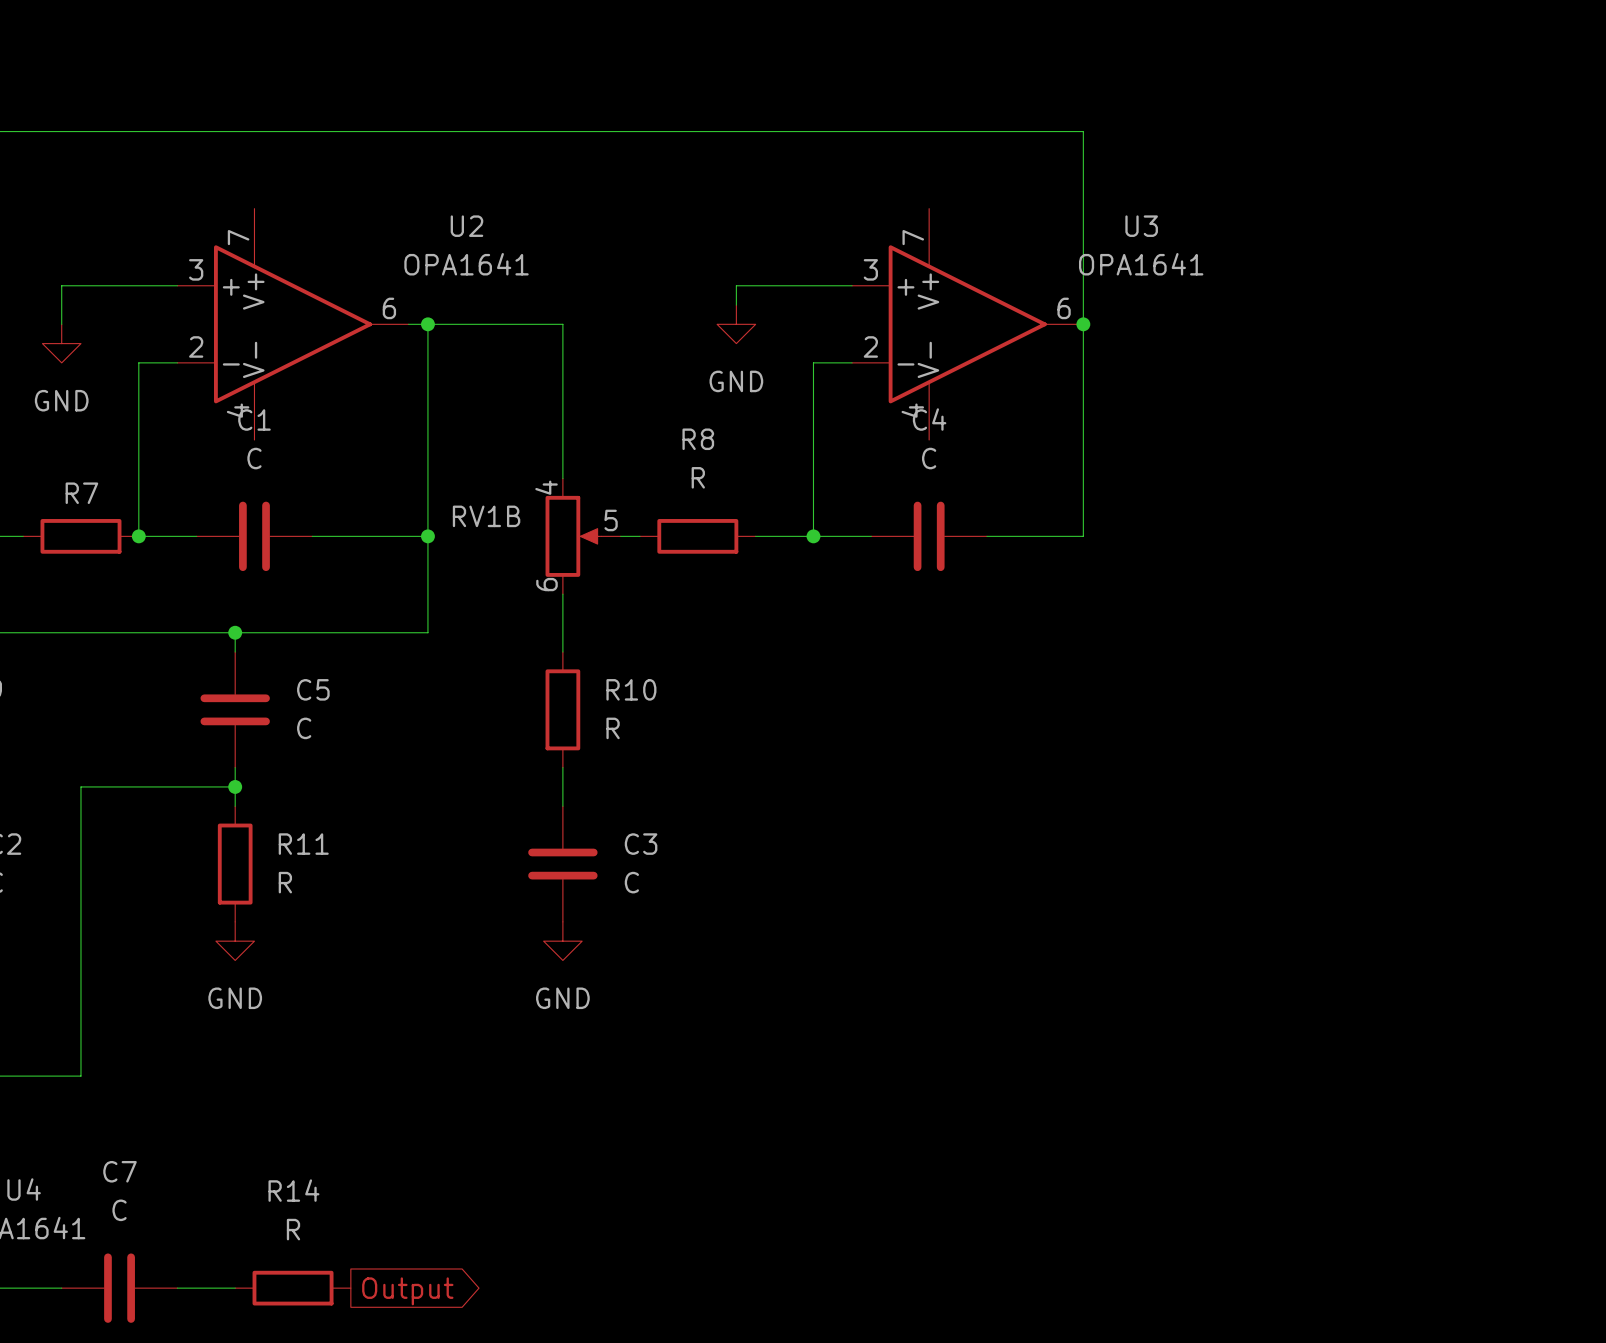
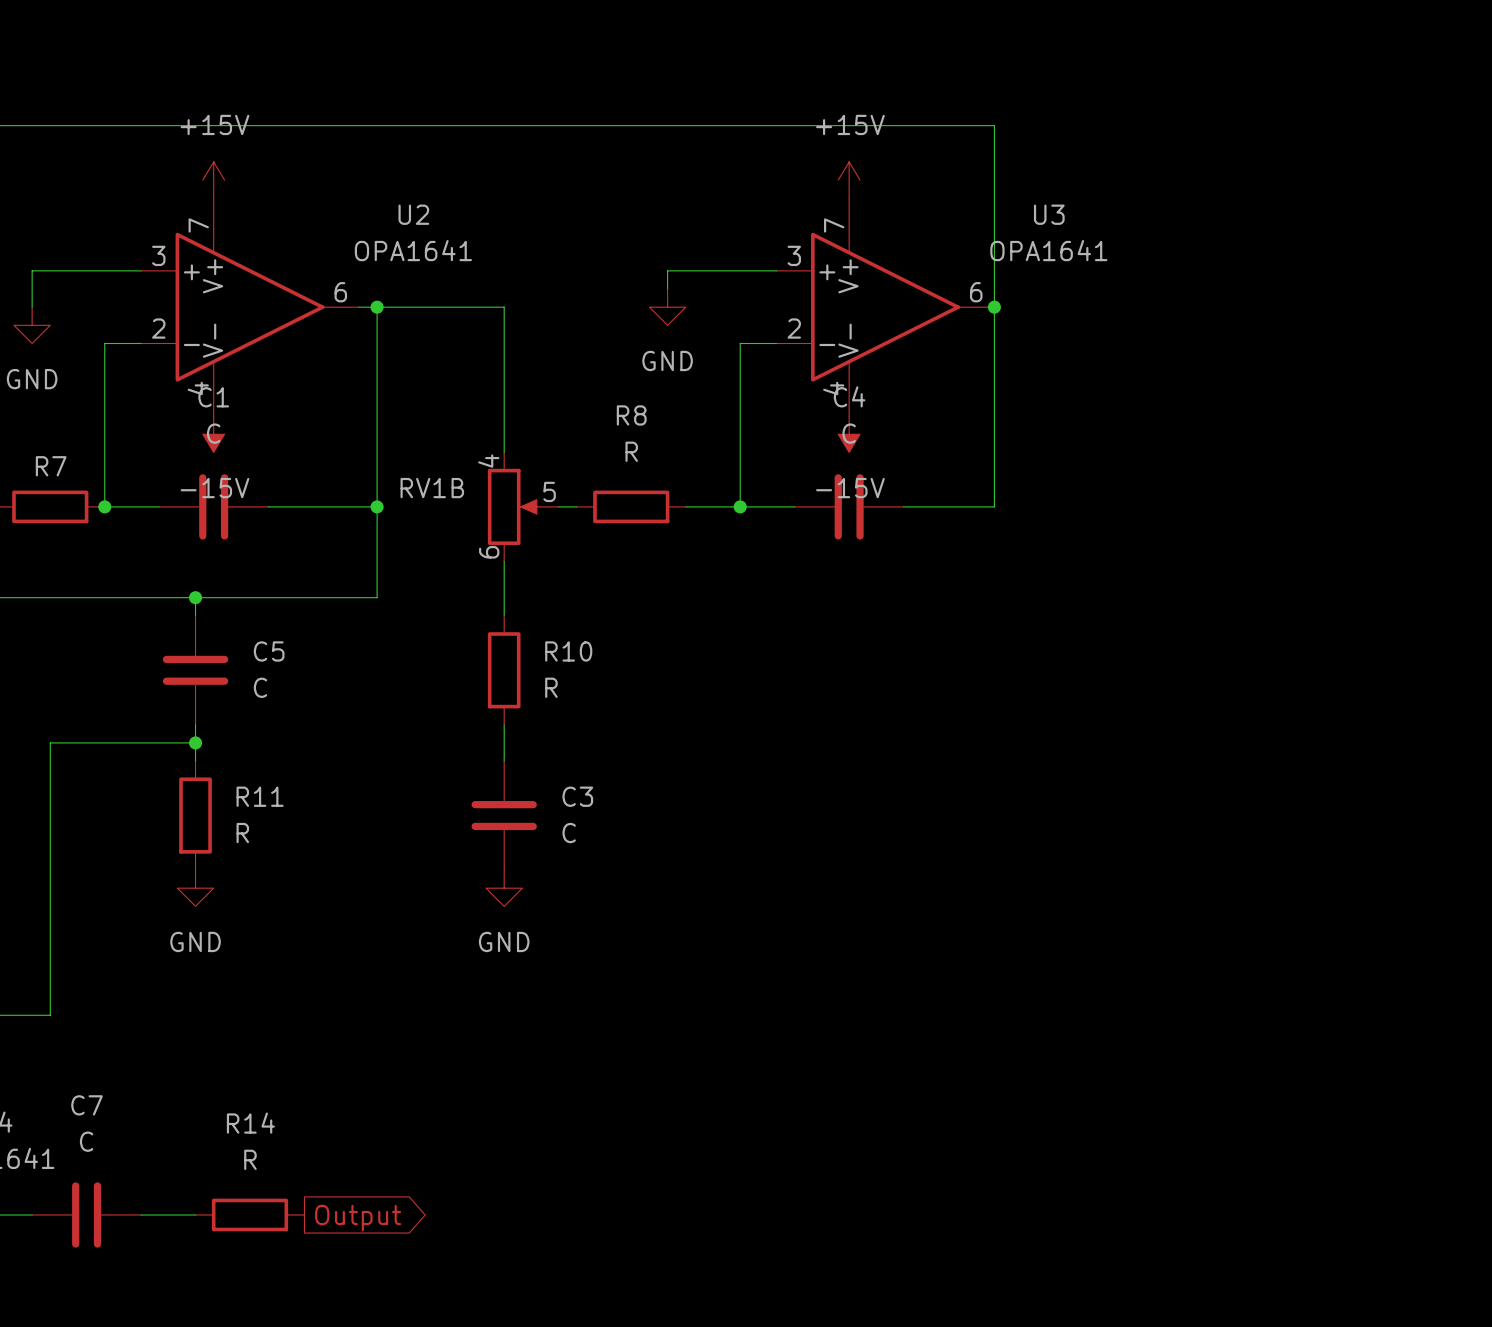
power symbol: none -> +15V (213, 180)
power symbol: none -> +15V (849, 180)
power symbol: none -> -15V (213, 434)
power symbol: none -> -15V (849, 434)

